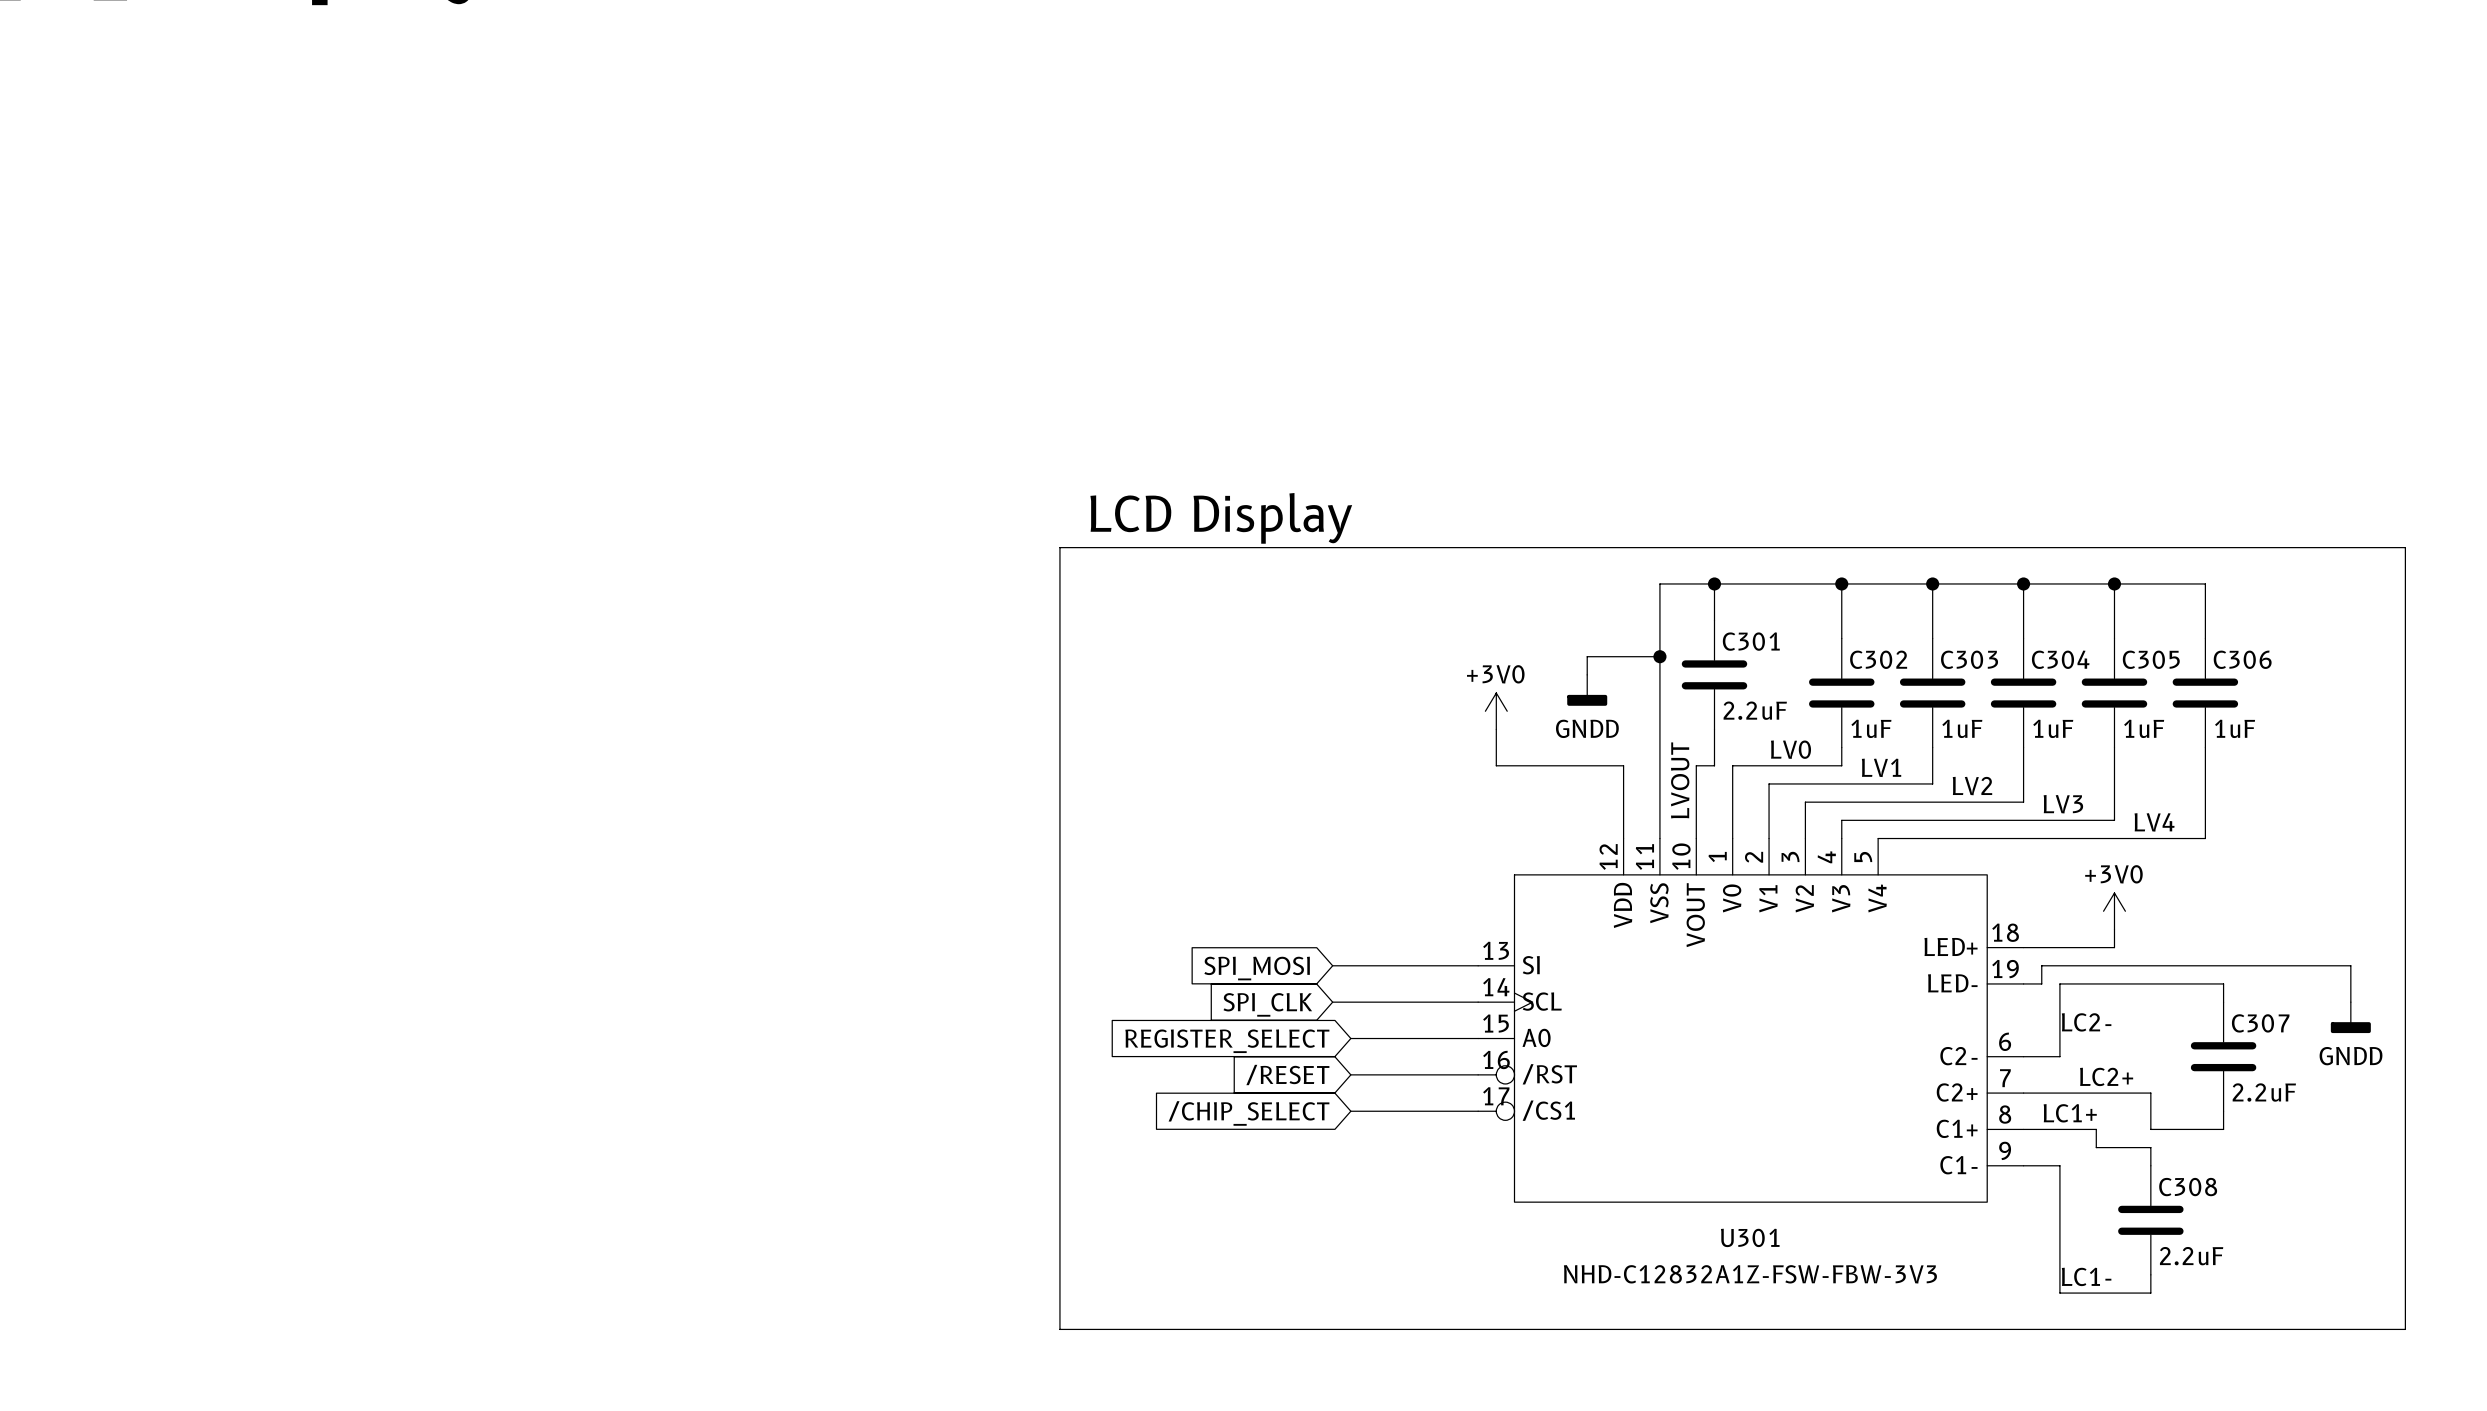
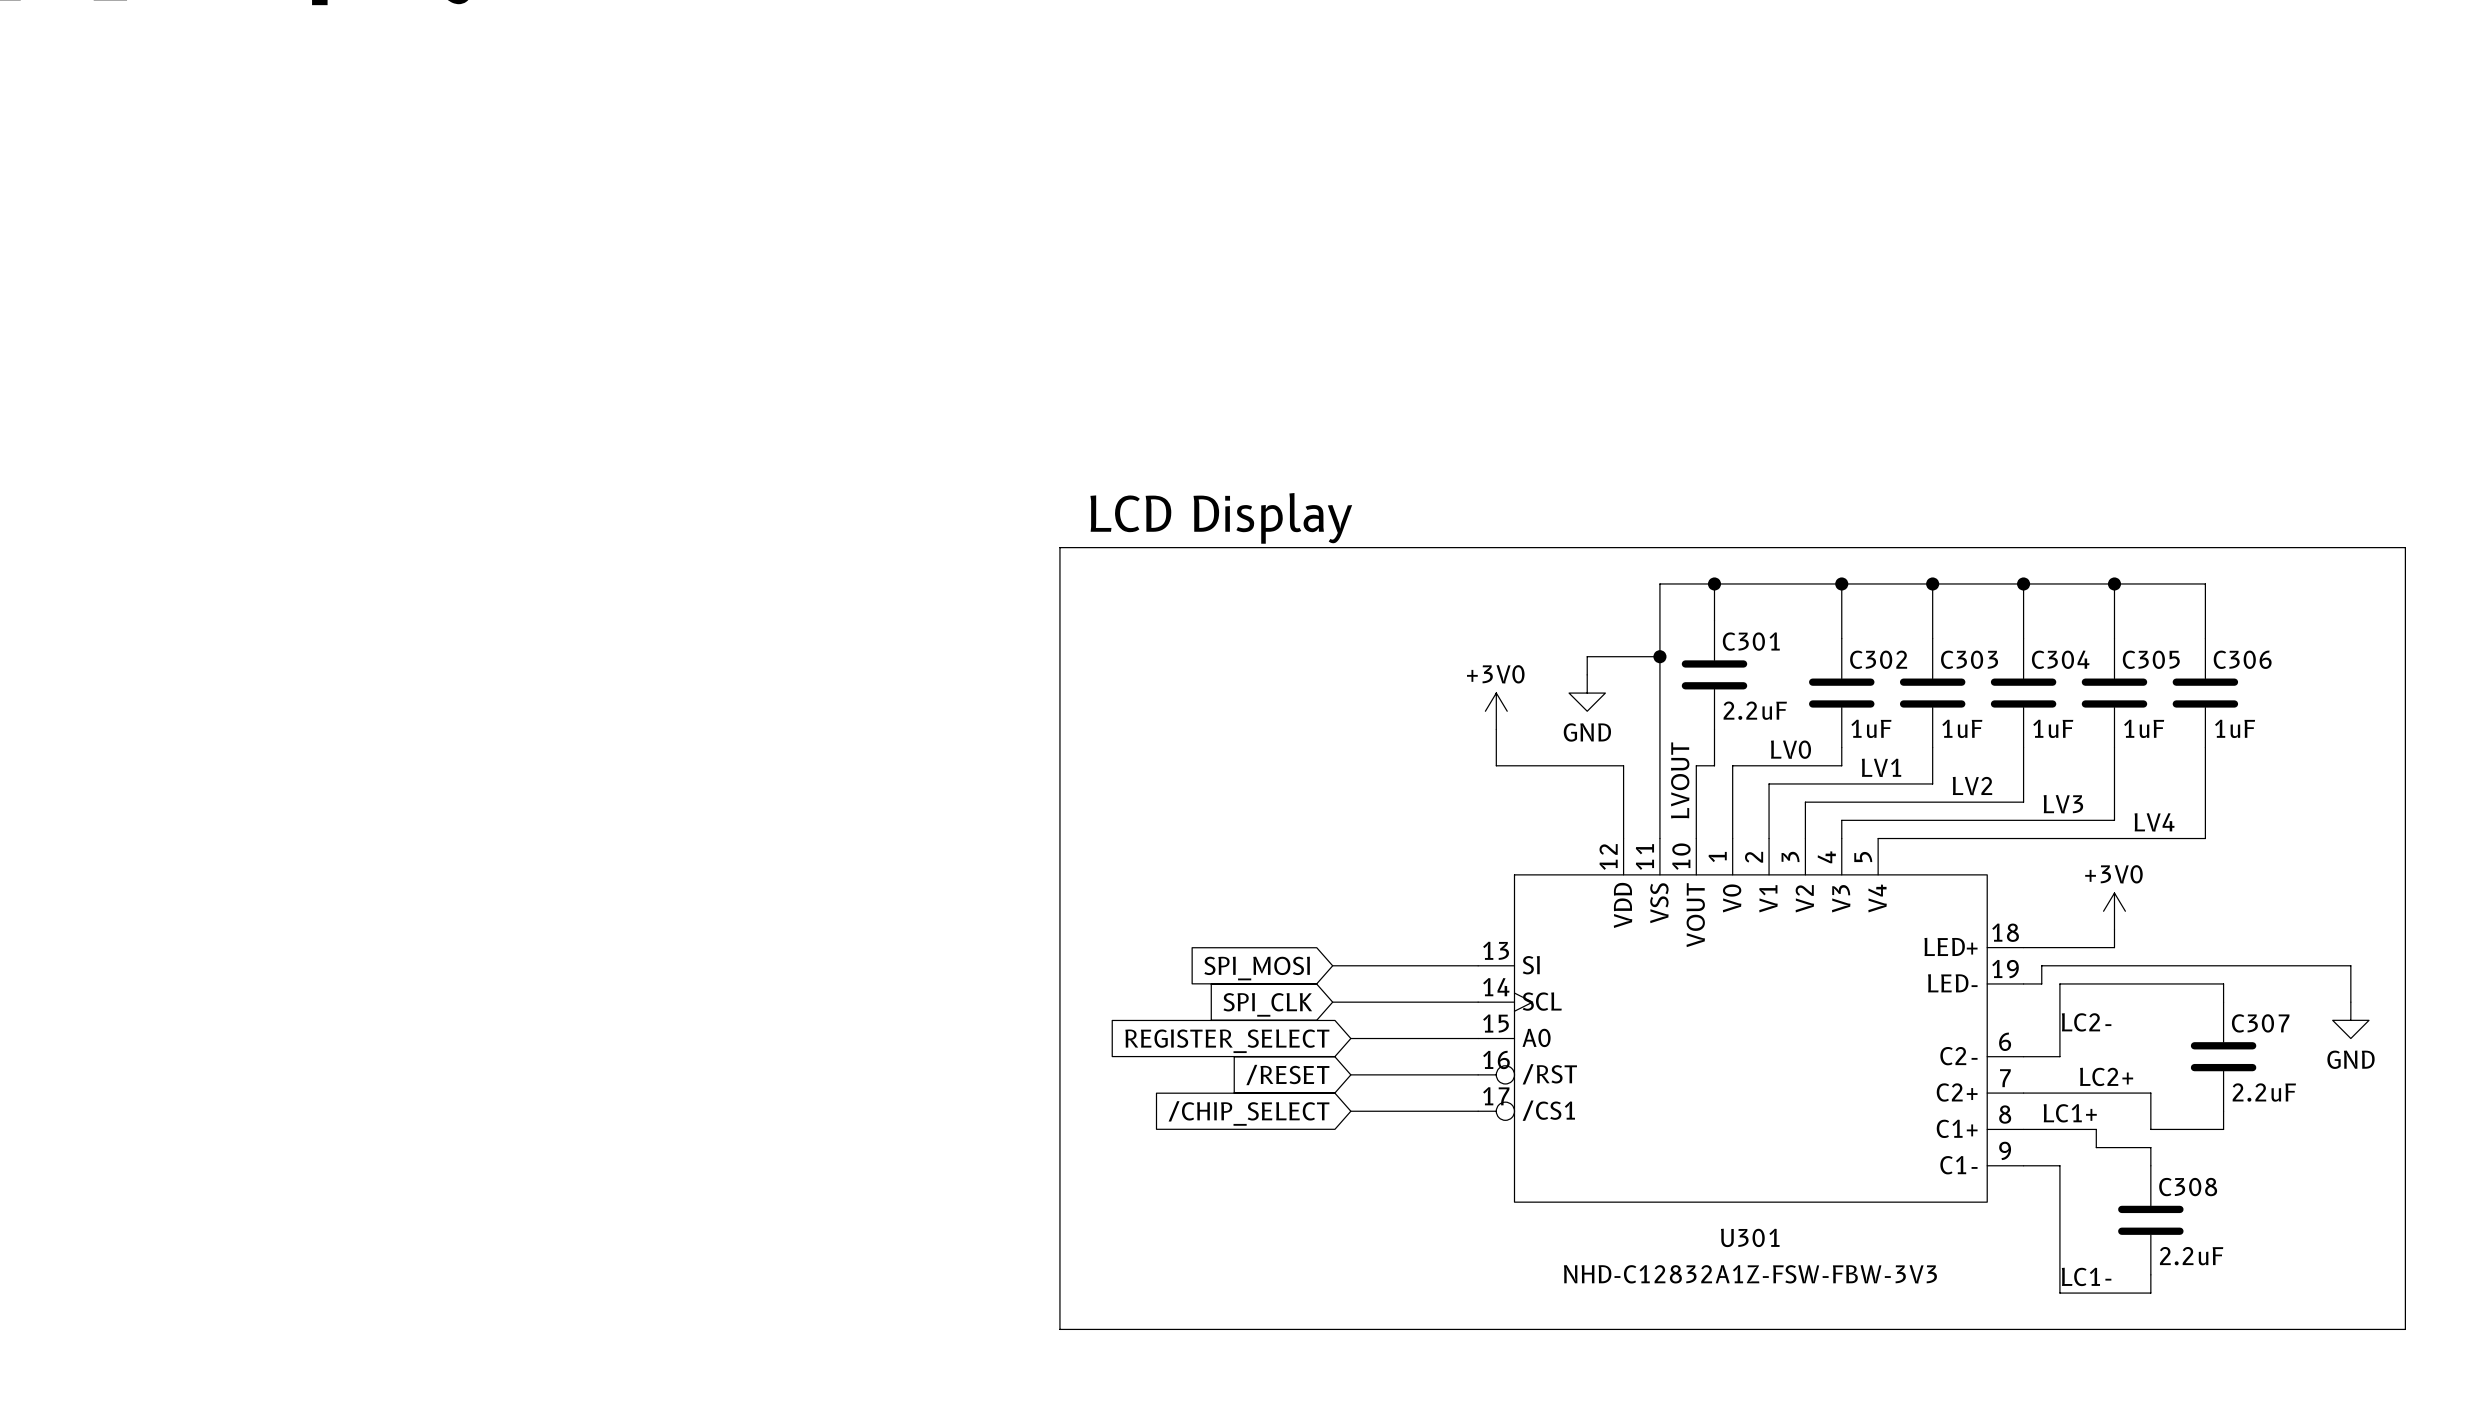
power symbol: GNDD (1587, 690) -> GND (1587, 693)
power symbol: GNDD (2350, 1017) -> GND (2350, 1020)

